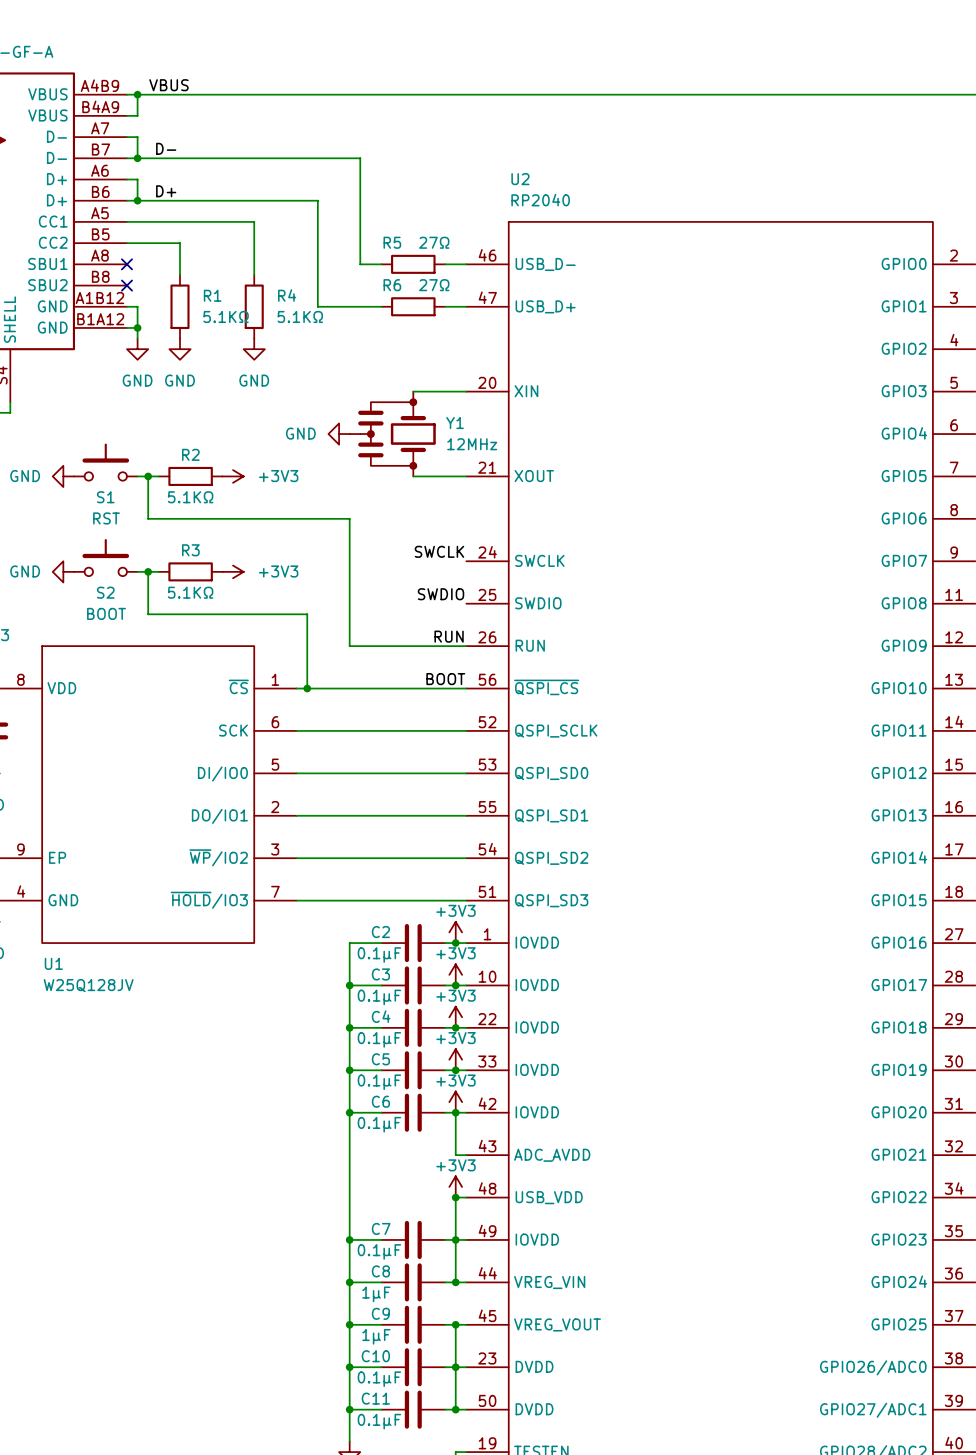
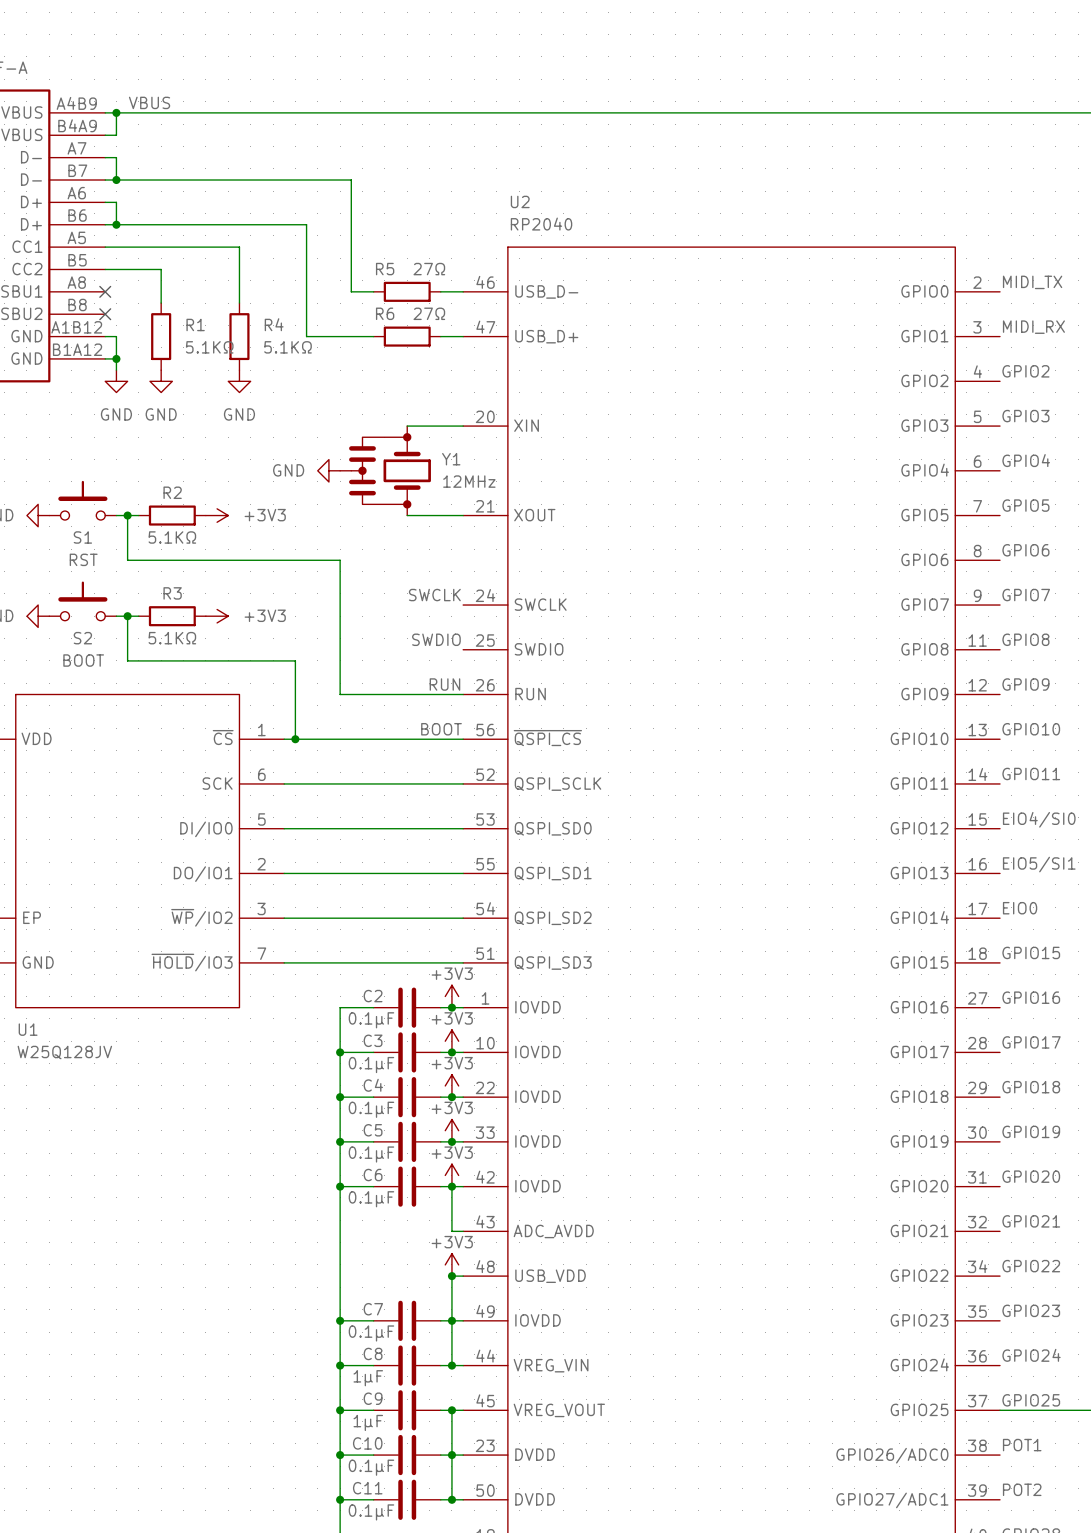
label: D- (166, 148) -> none
label: D+ (166, 191) -> none

